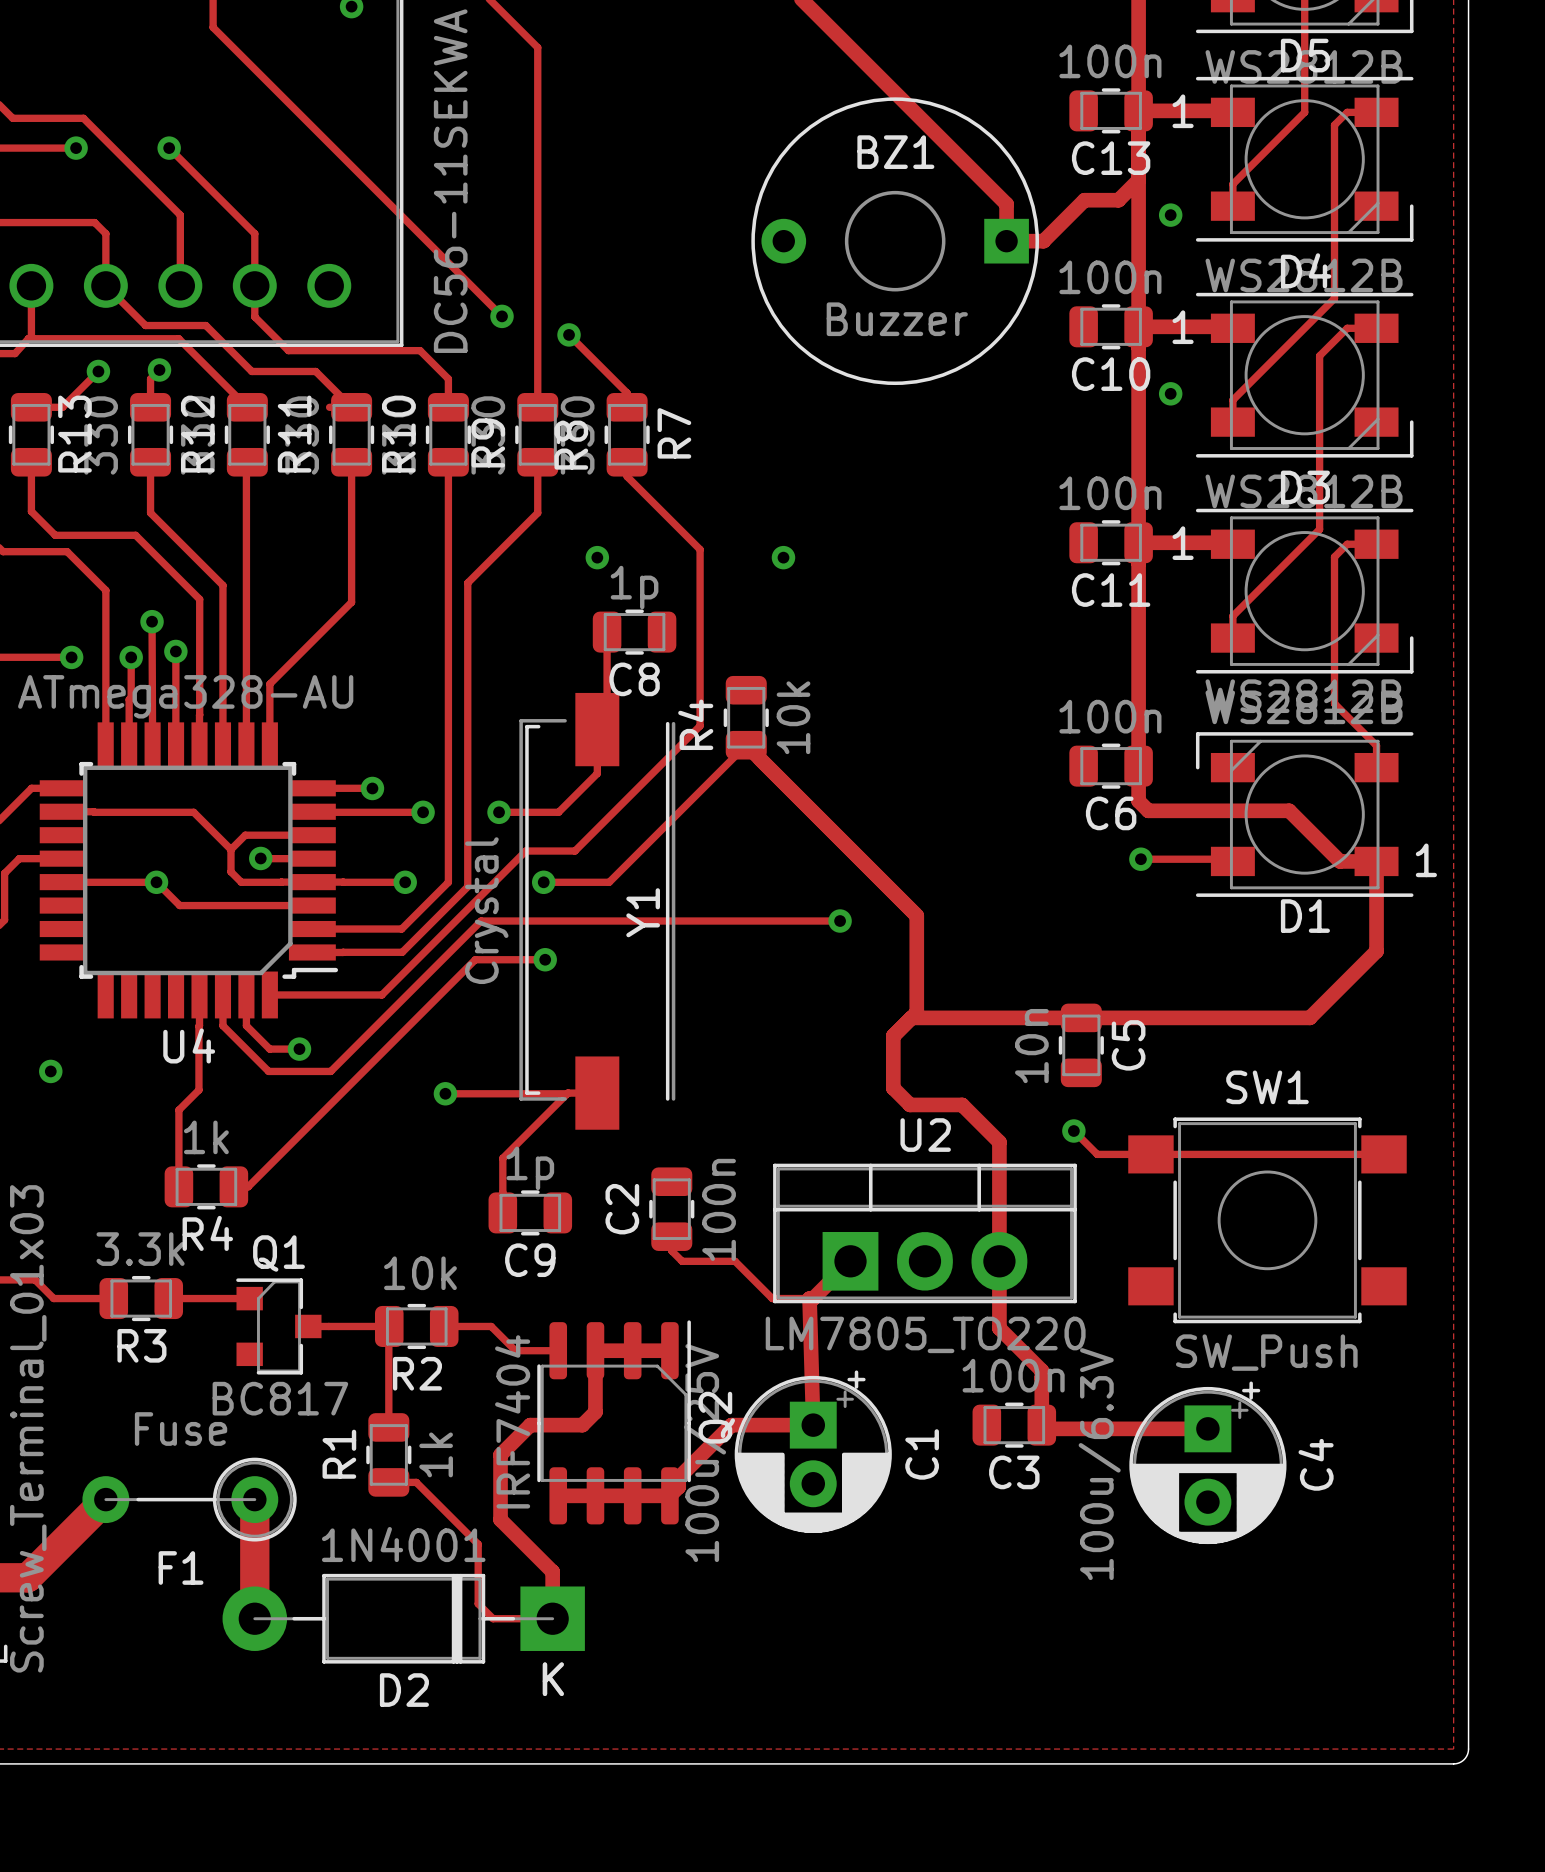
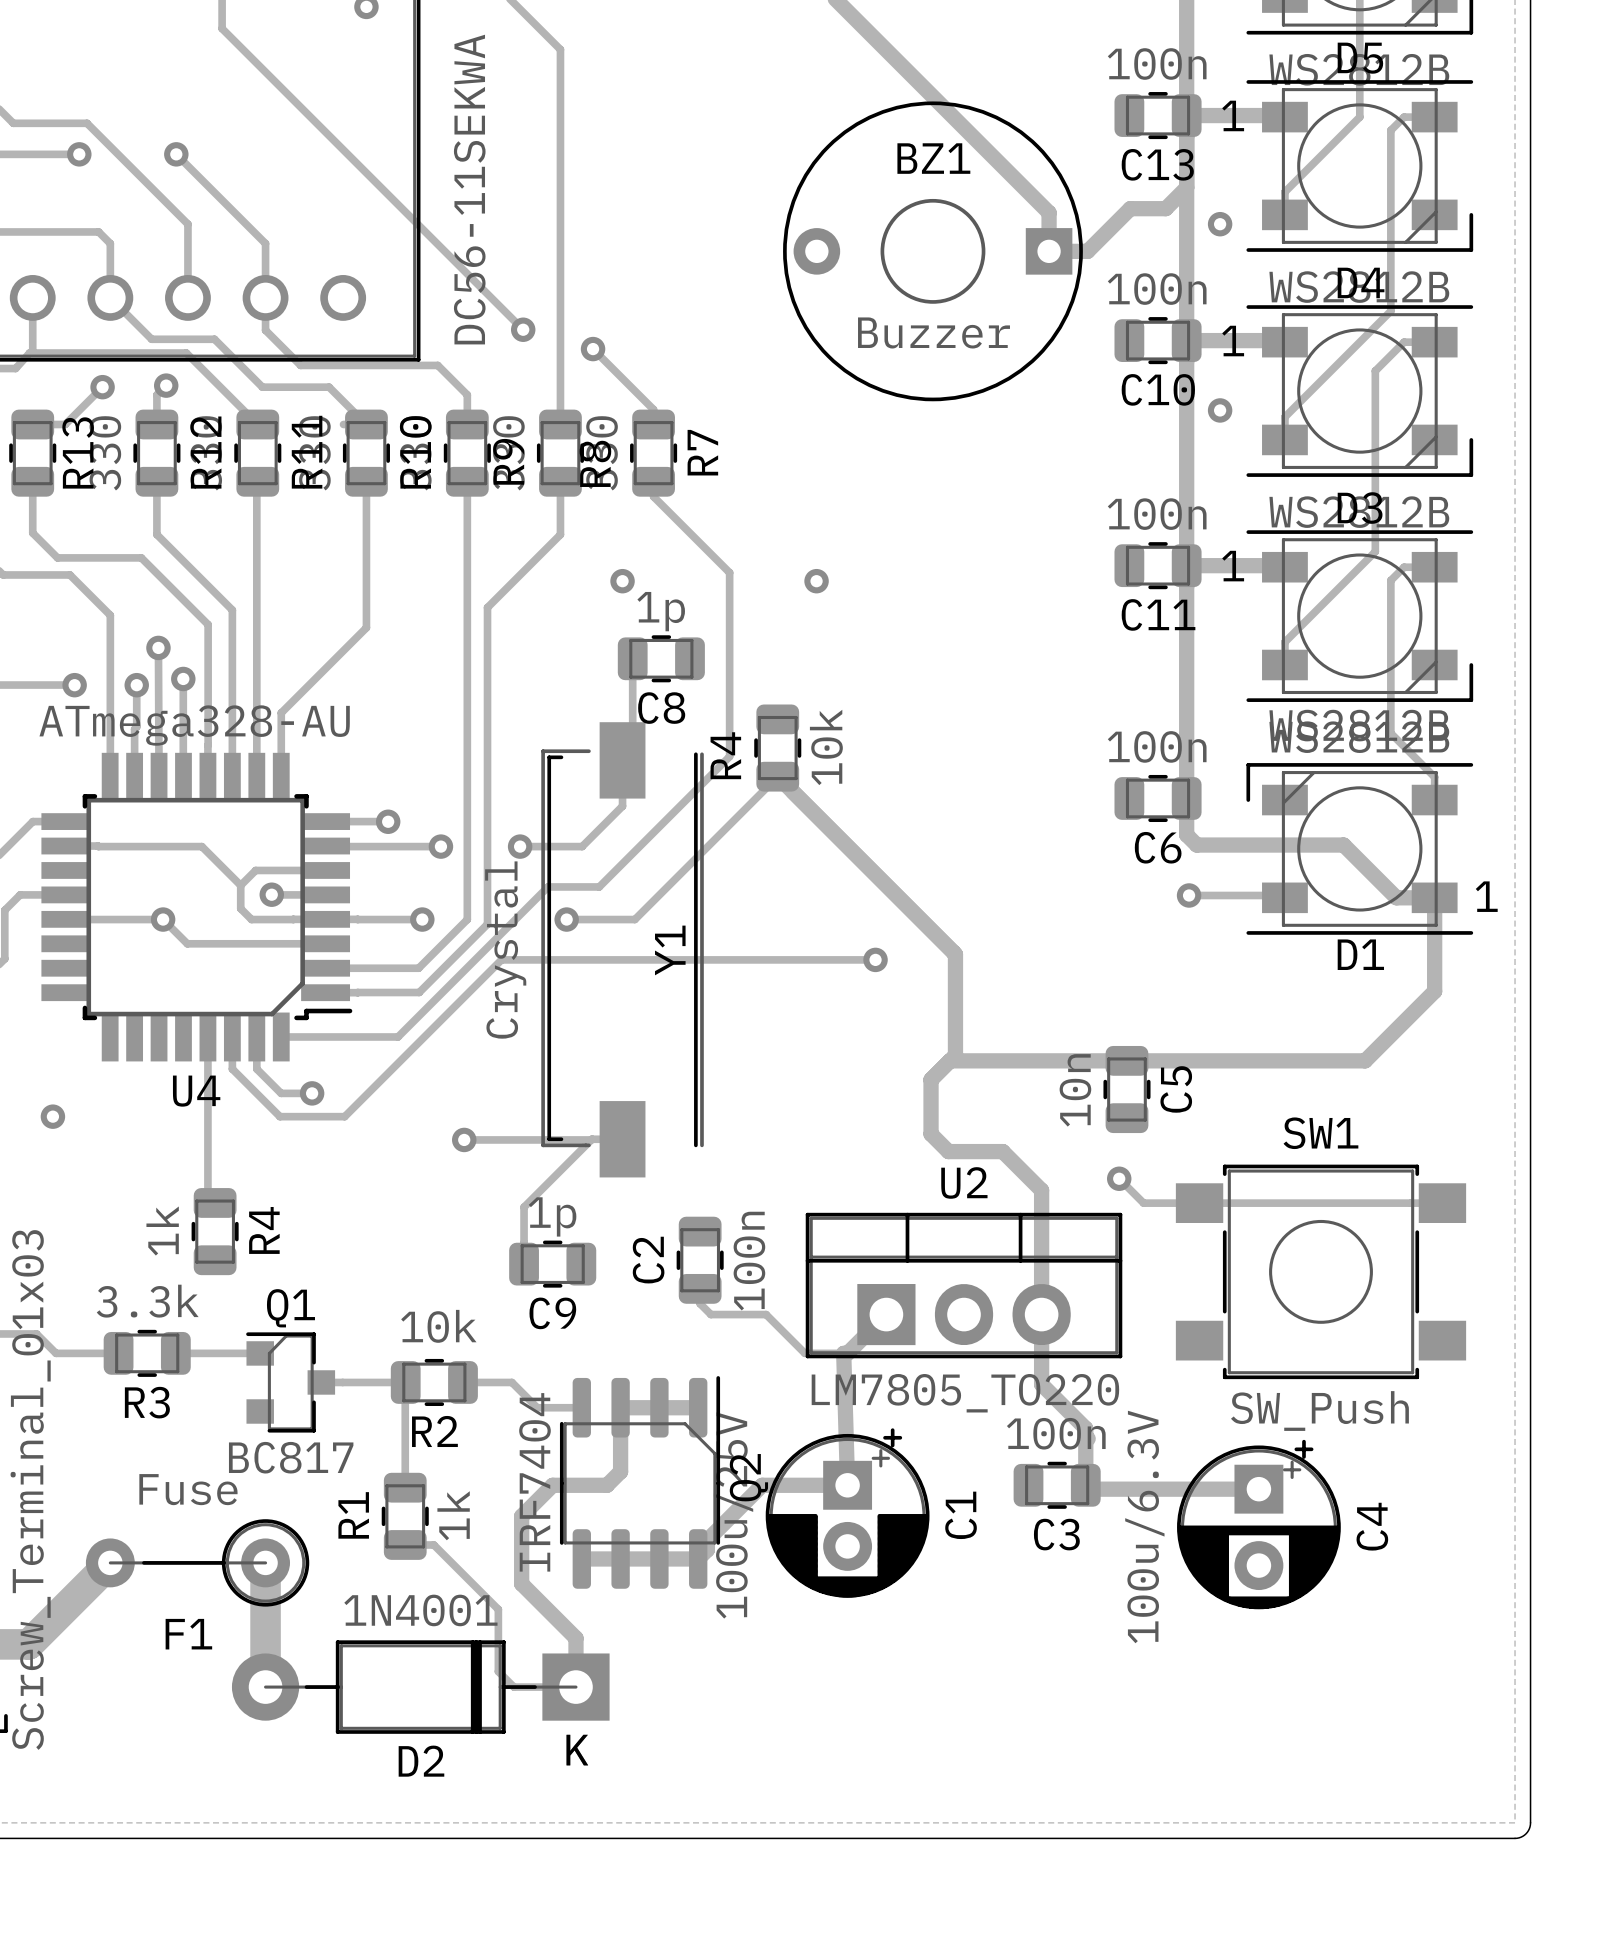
track: (545, 959) (475, 959) (248, 1186) (233, 1186) -> none
via: (545, 959) -> none
track: (199, 1025) (198, 1090) (178, 1110) (178, 1186) -> (207, 1069) (207, 1195) (215, 1202)
R4 value position: 1k (206, 1137) -> 1k (162, 1231)
R4 rotation: 0° (206, 1186) -> 90° clockwise (215, 1231)
R4 name position: R4 (207, 1233) -> R4 (264, 1230)

